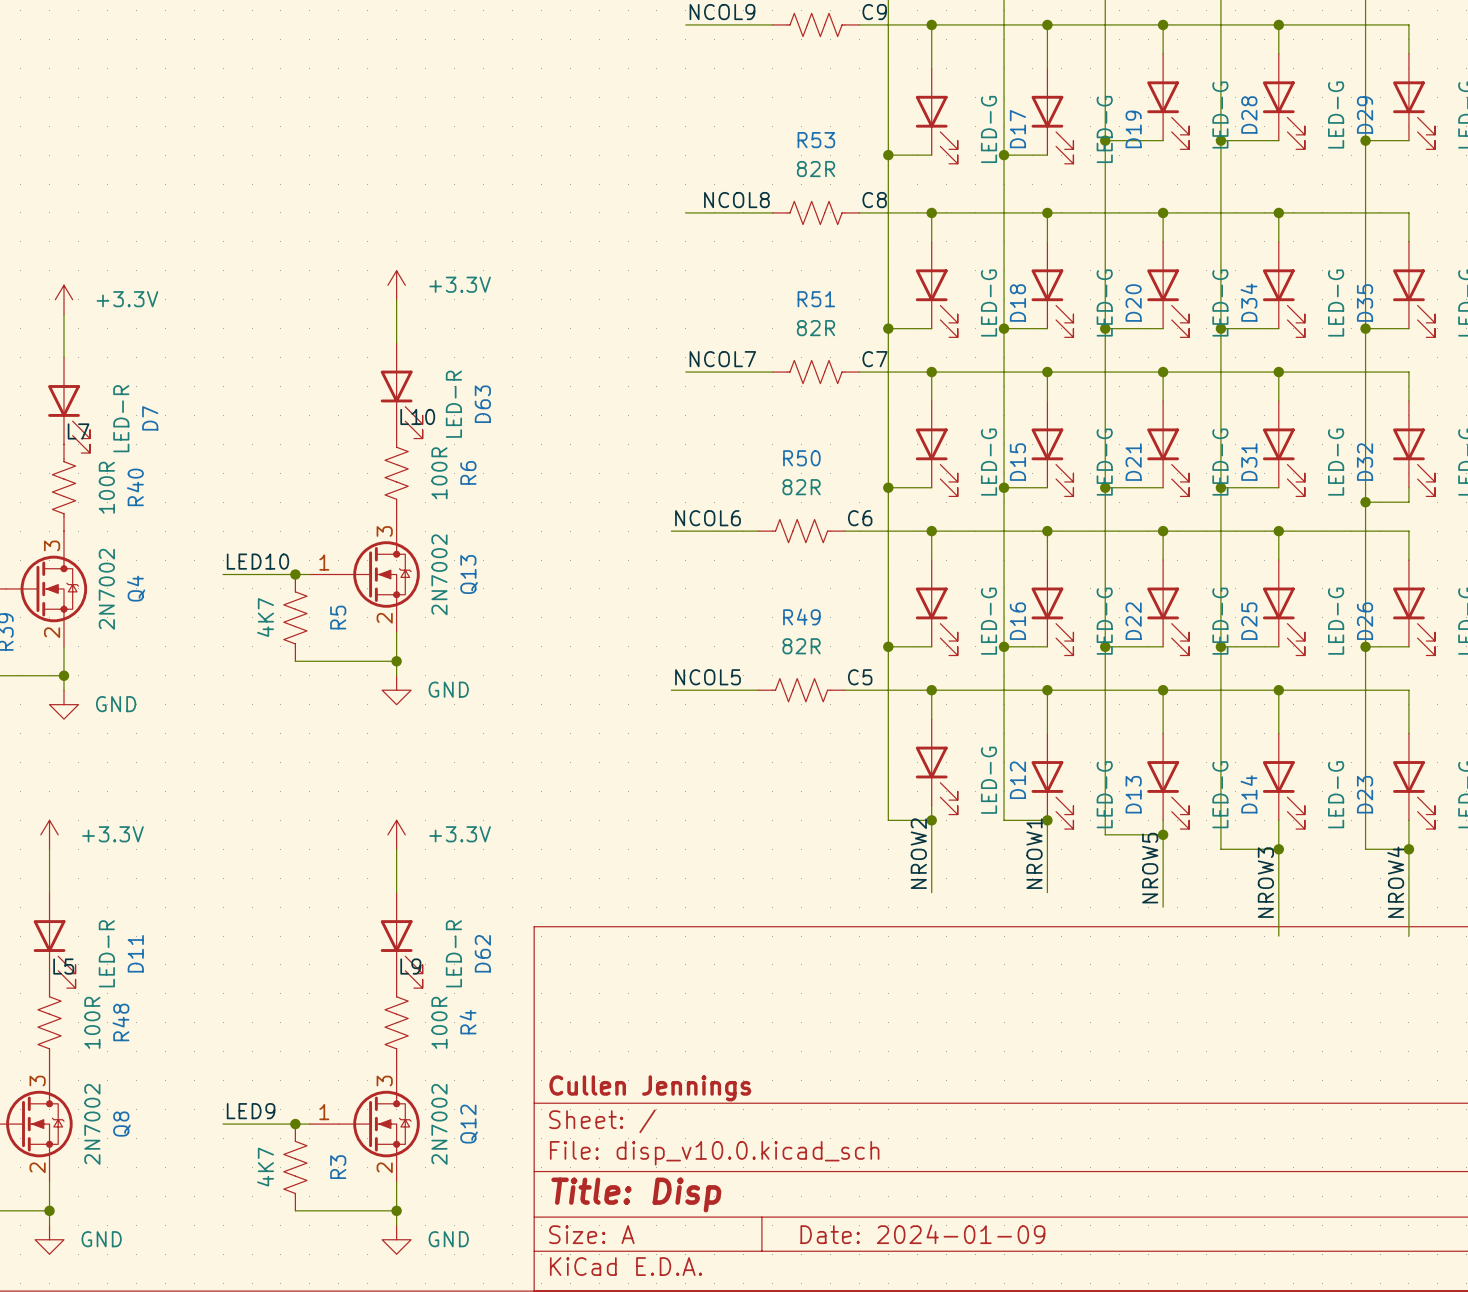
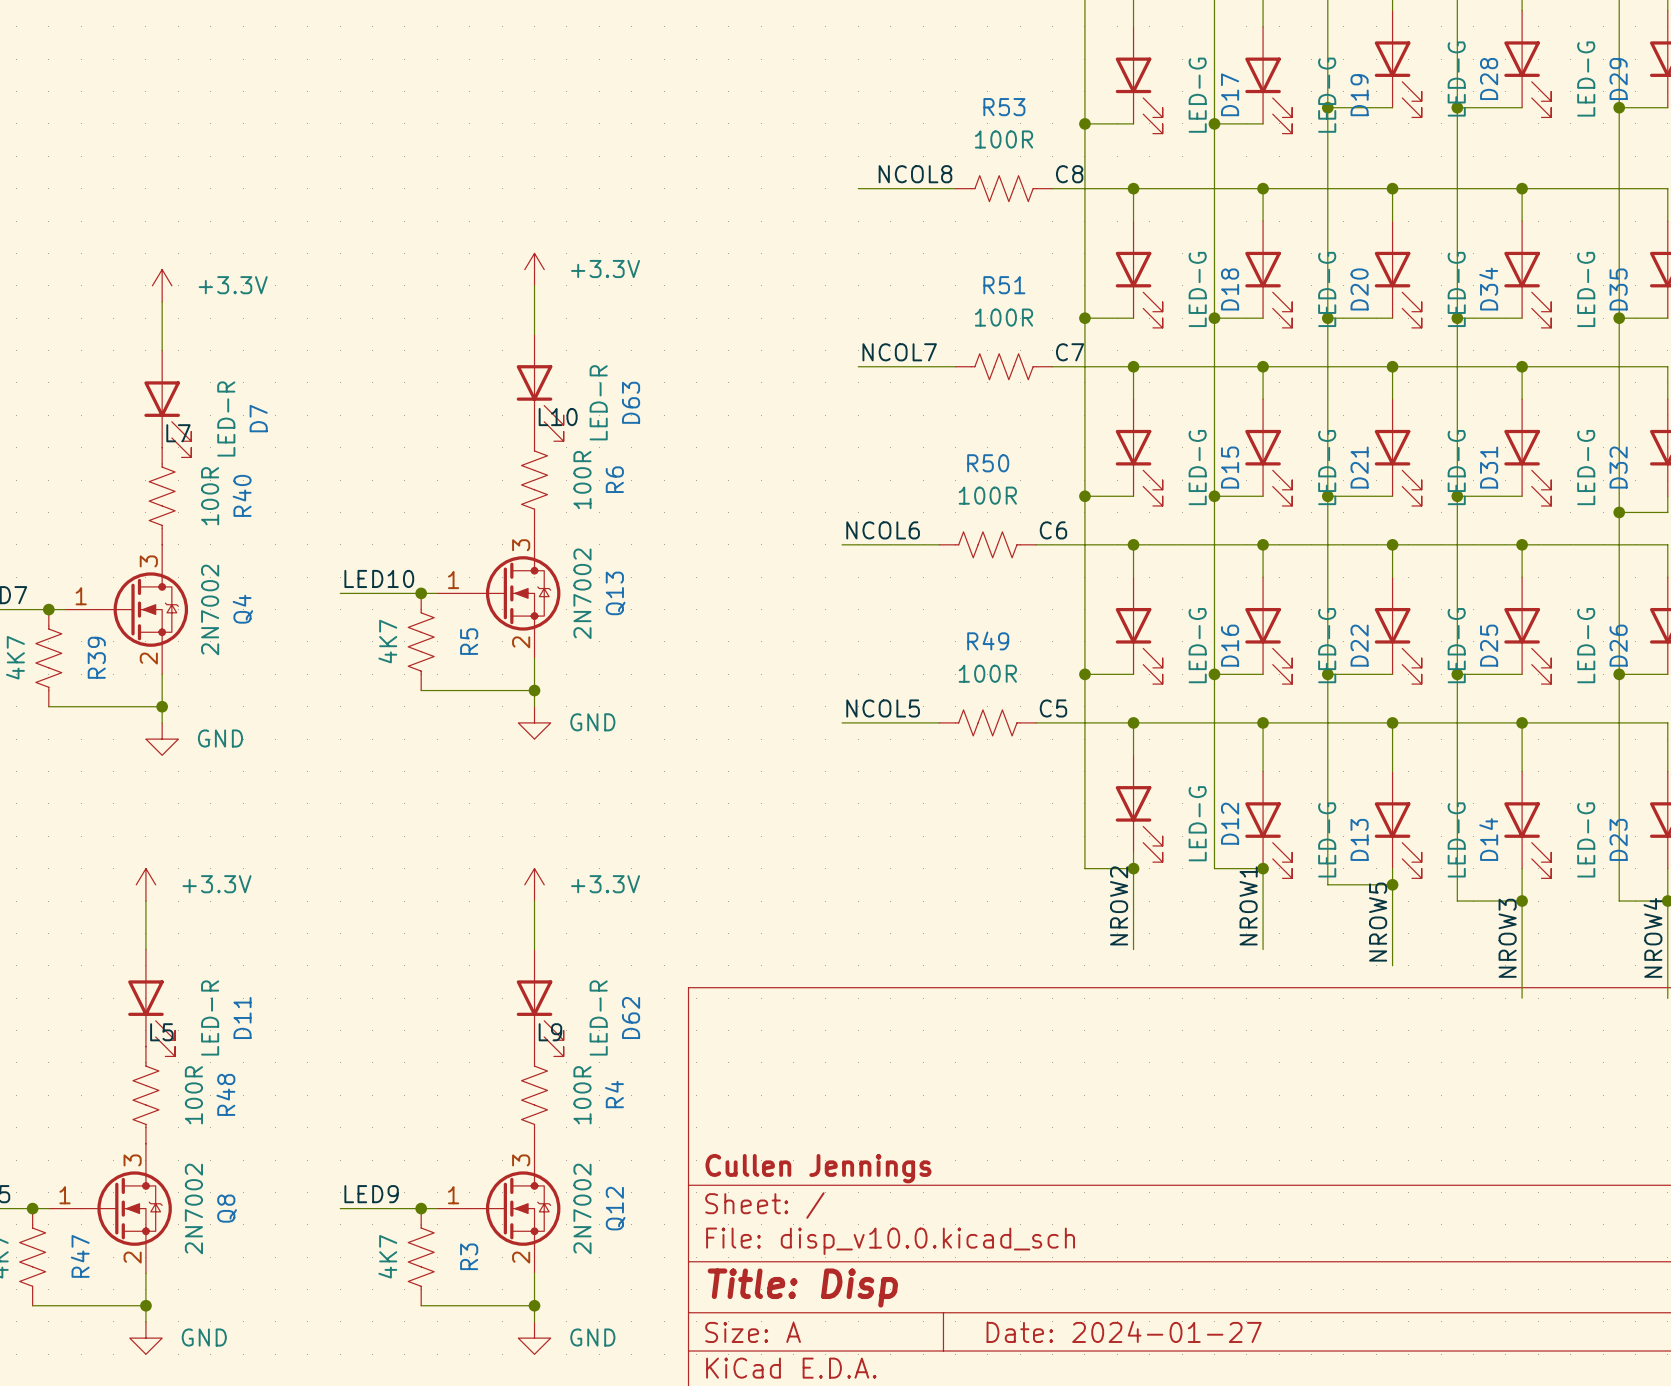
R53 value: 82R (816, 169) -> 100R (1004, 139)
R51 value: 82R (816, 328) -> 100R (1004, 317)
R50 value: 82R (801, 487) -> 100R (987, 495)
R49 value: 82R (801, 646) -> 100R (987, 673)
title block: Date: 2024-01-09 (922, 1234) -> Date: 2024-01-27 (1124, 1331)

